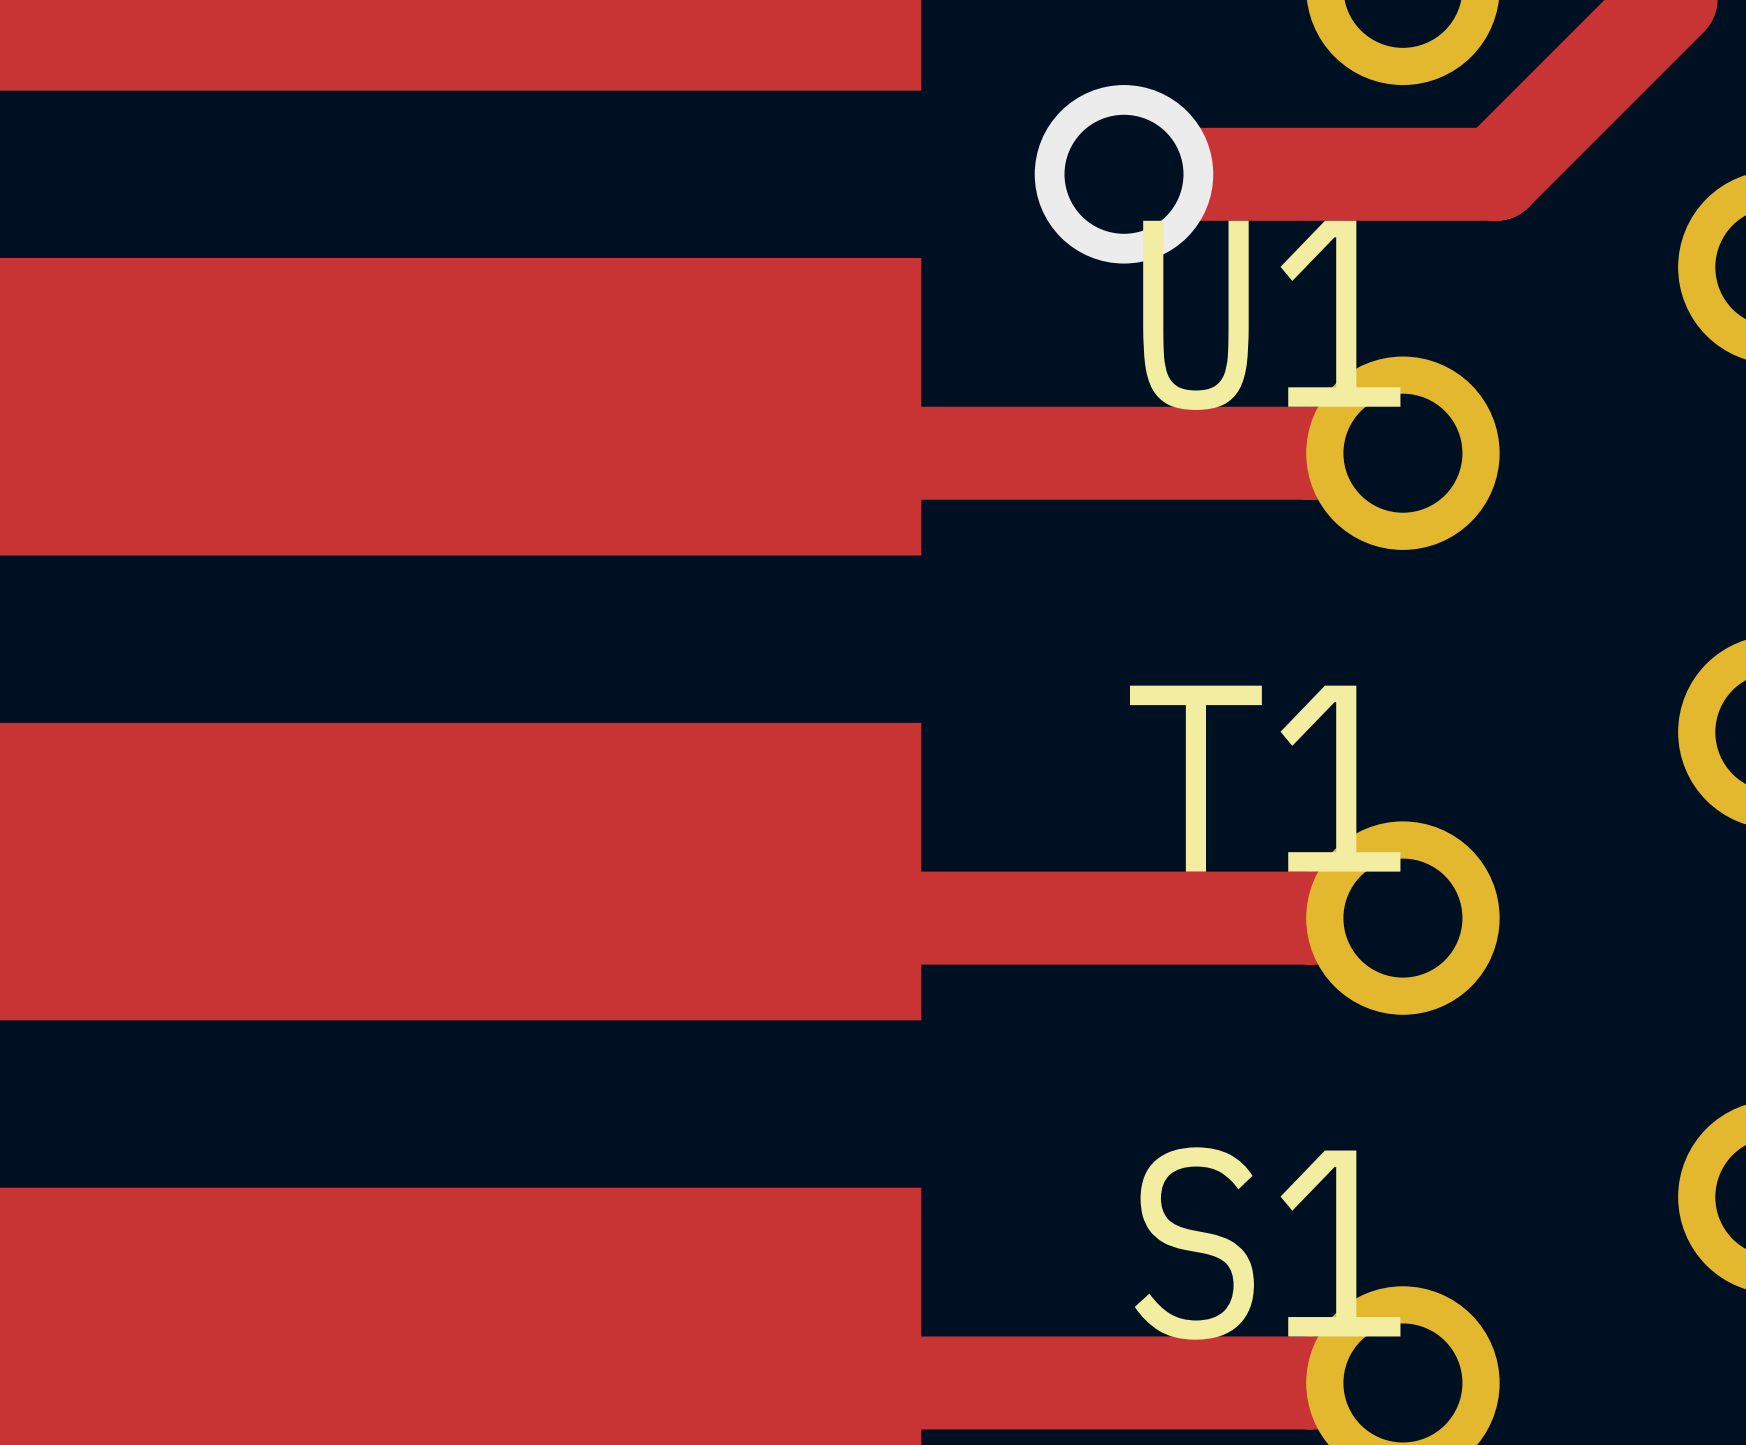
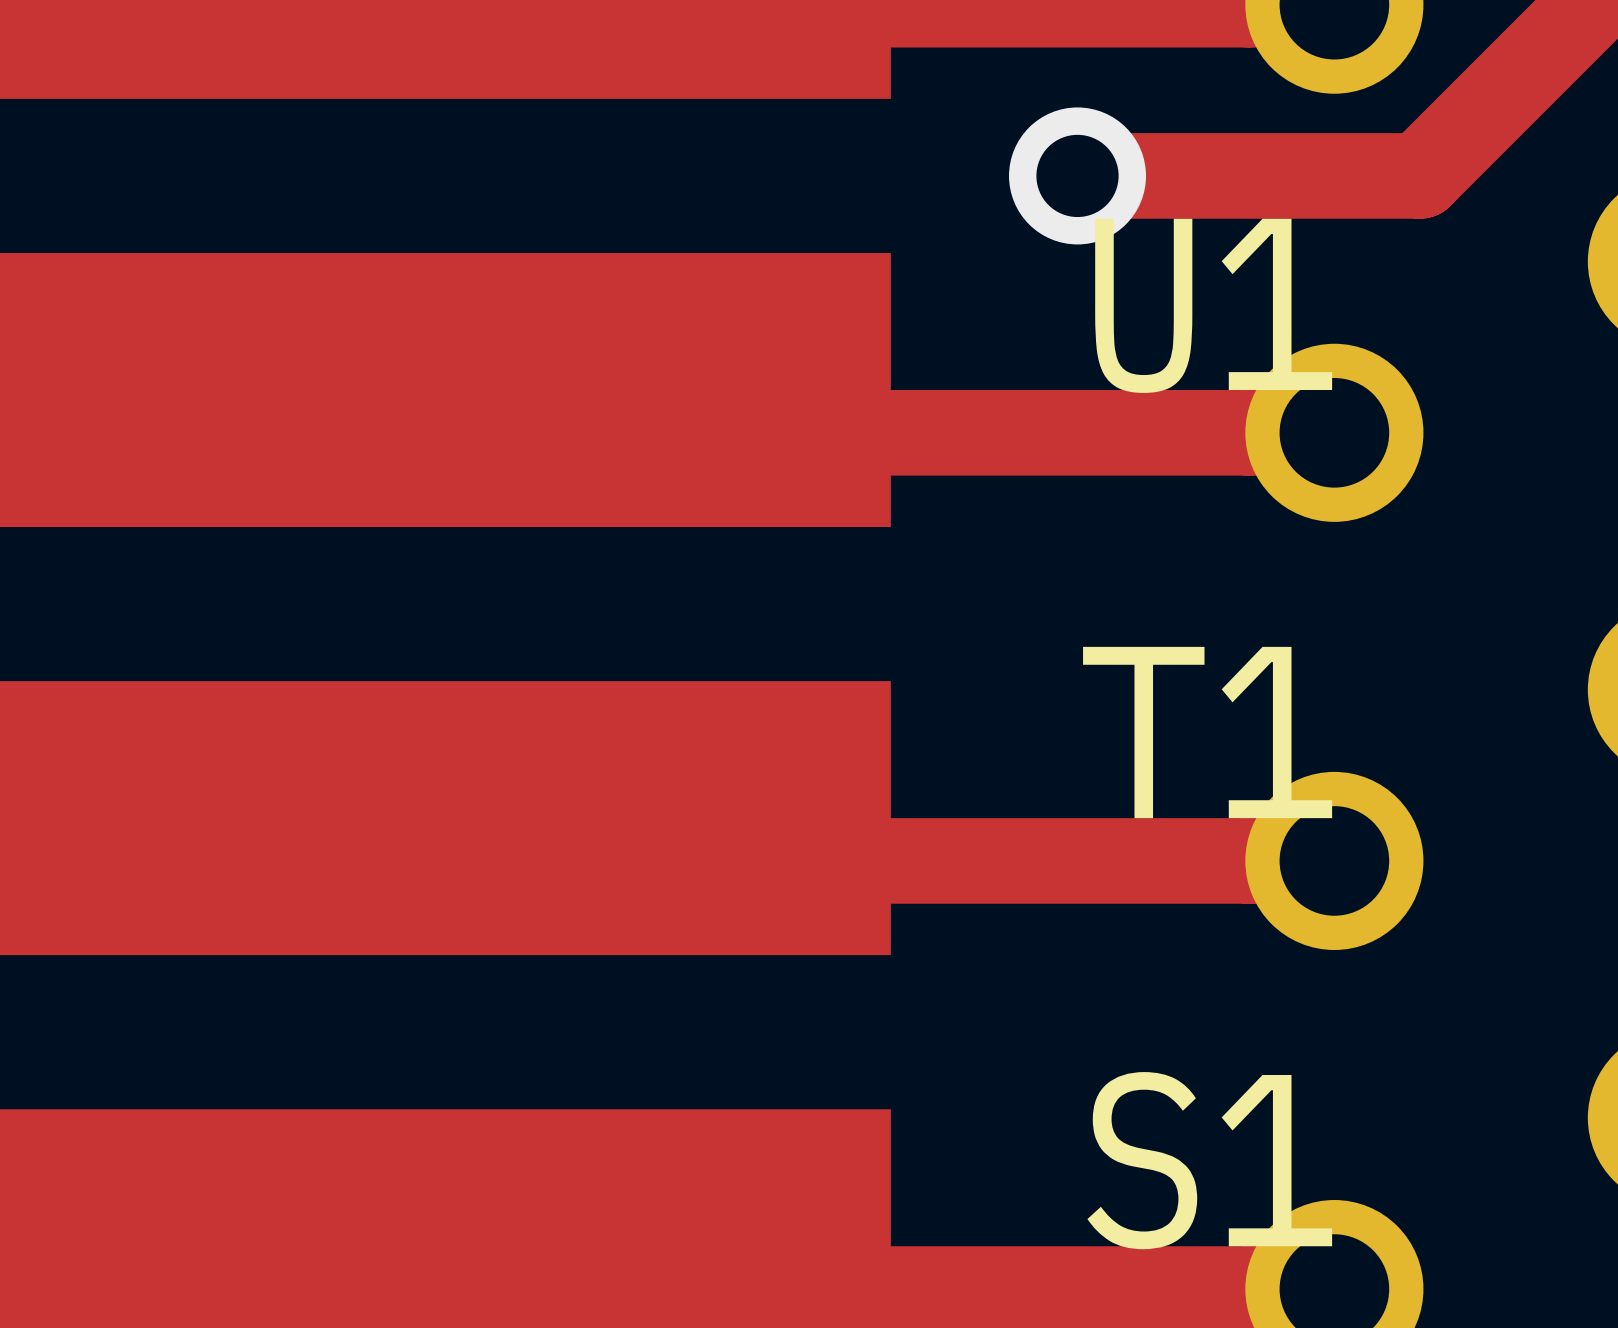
via size: [1034, 85, 1214, 264] -> [1009, 107, 1147, 245]

